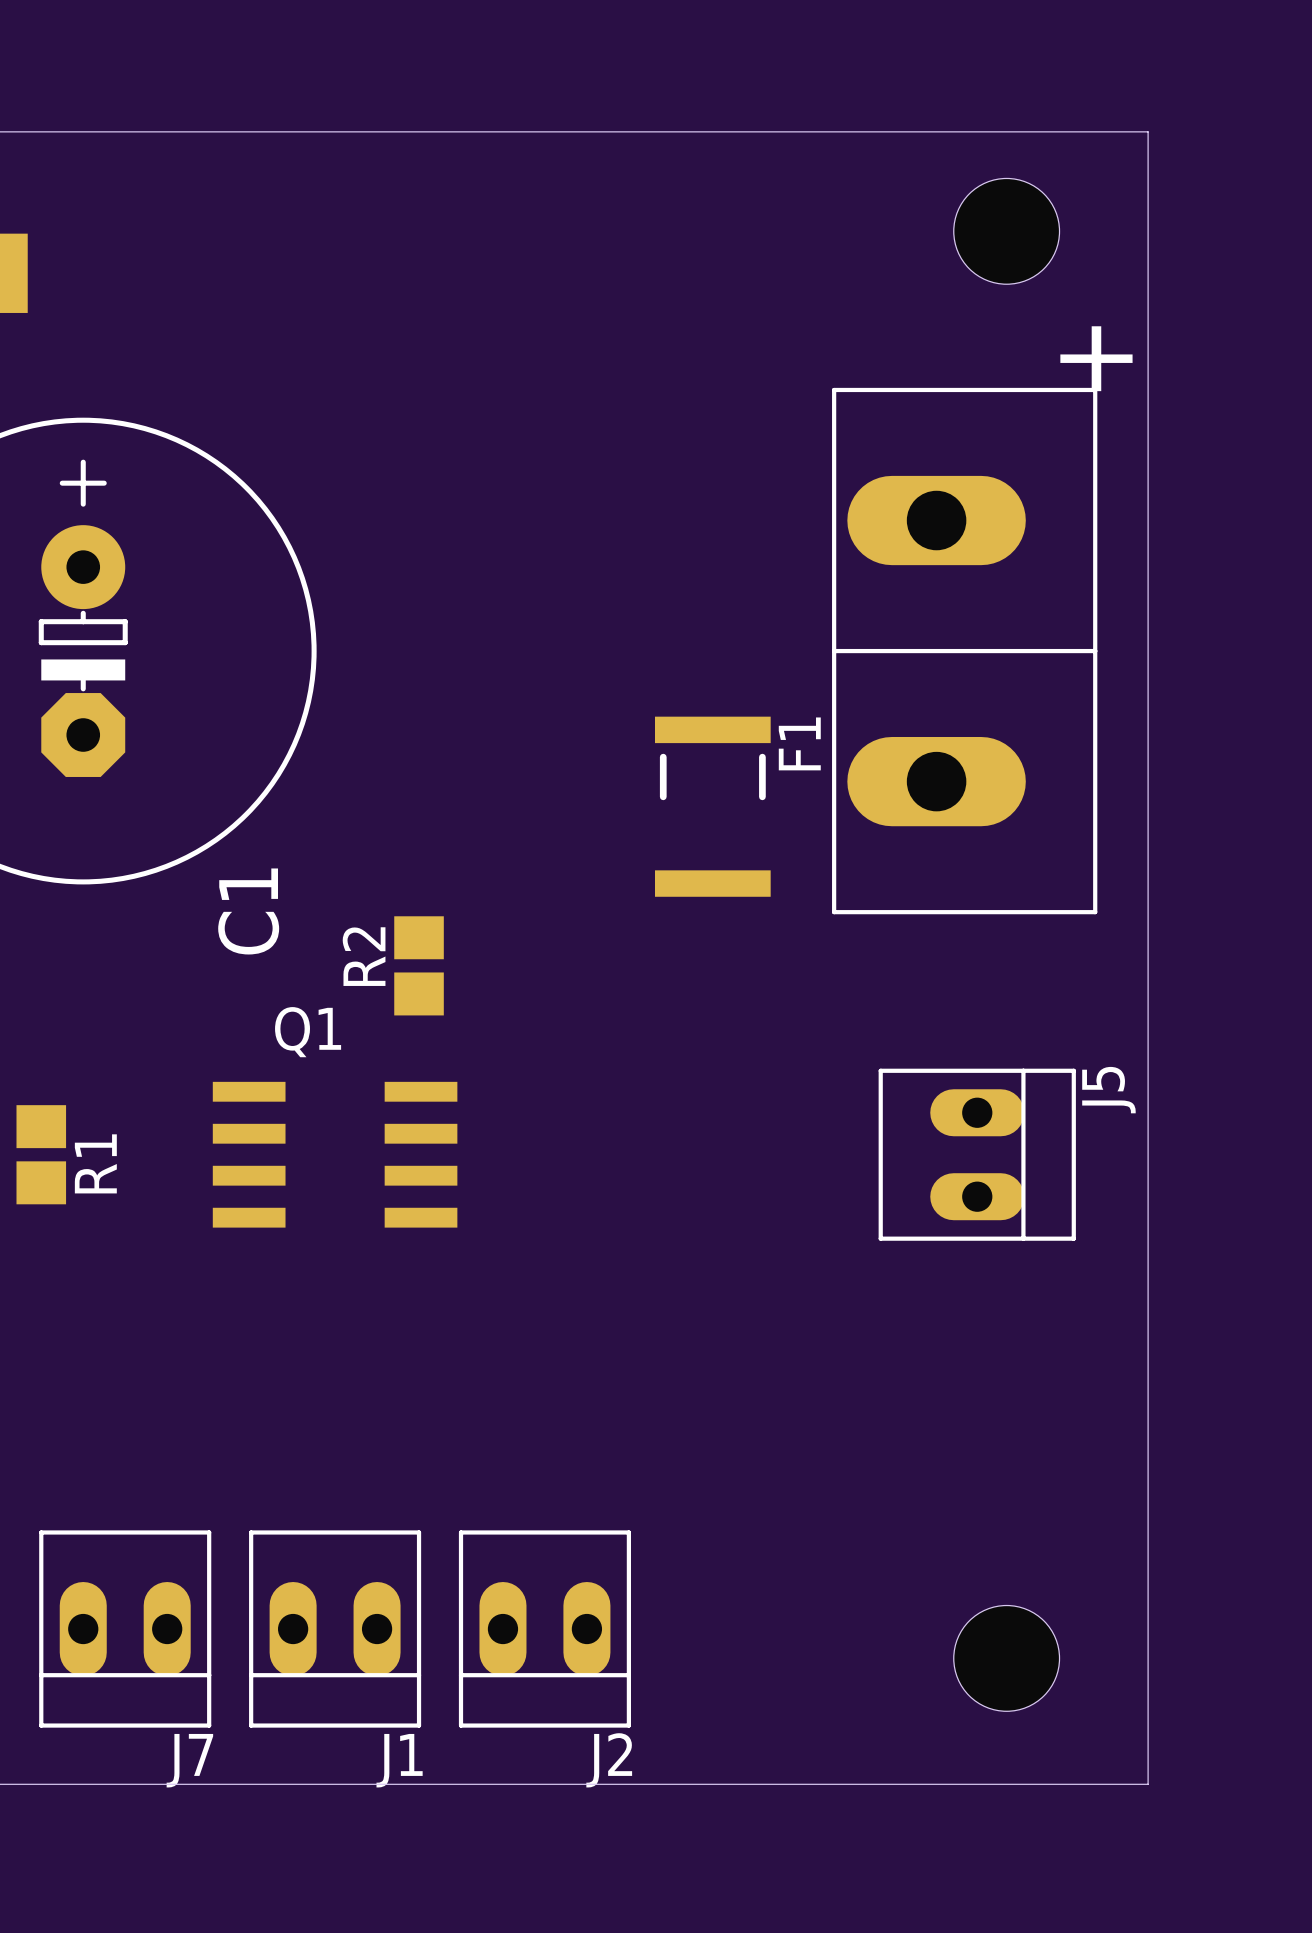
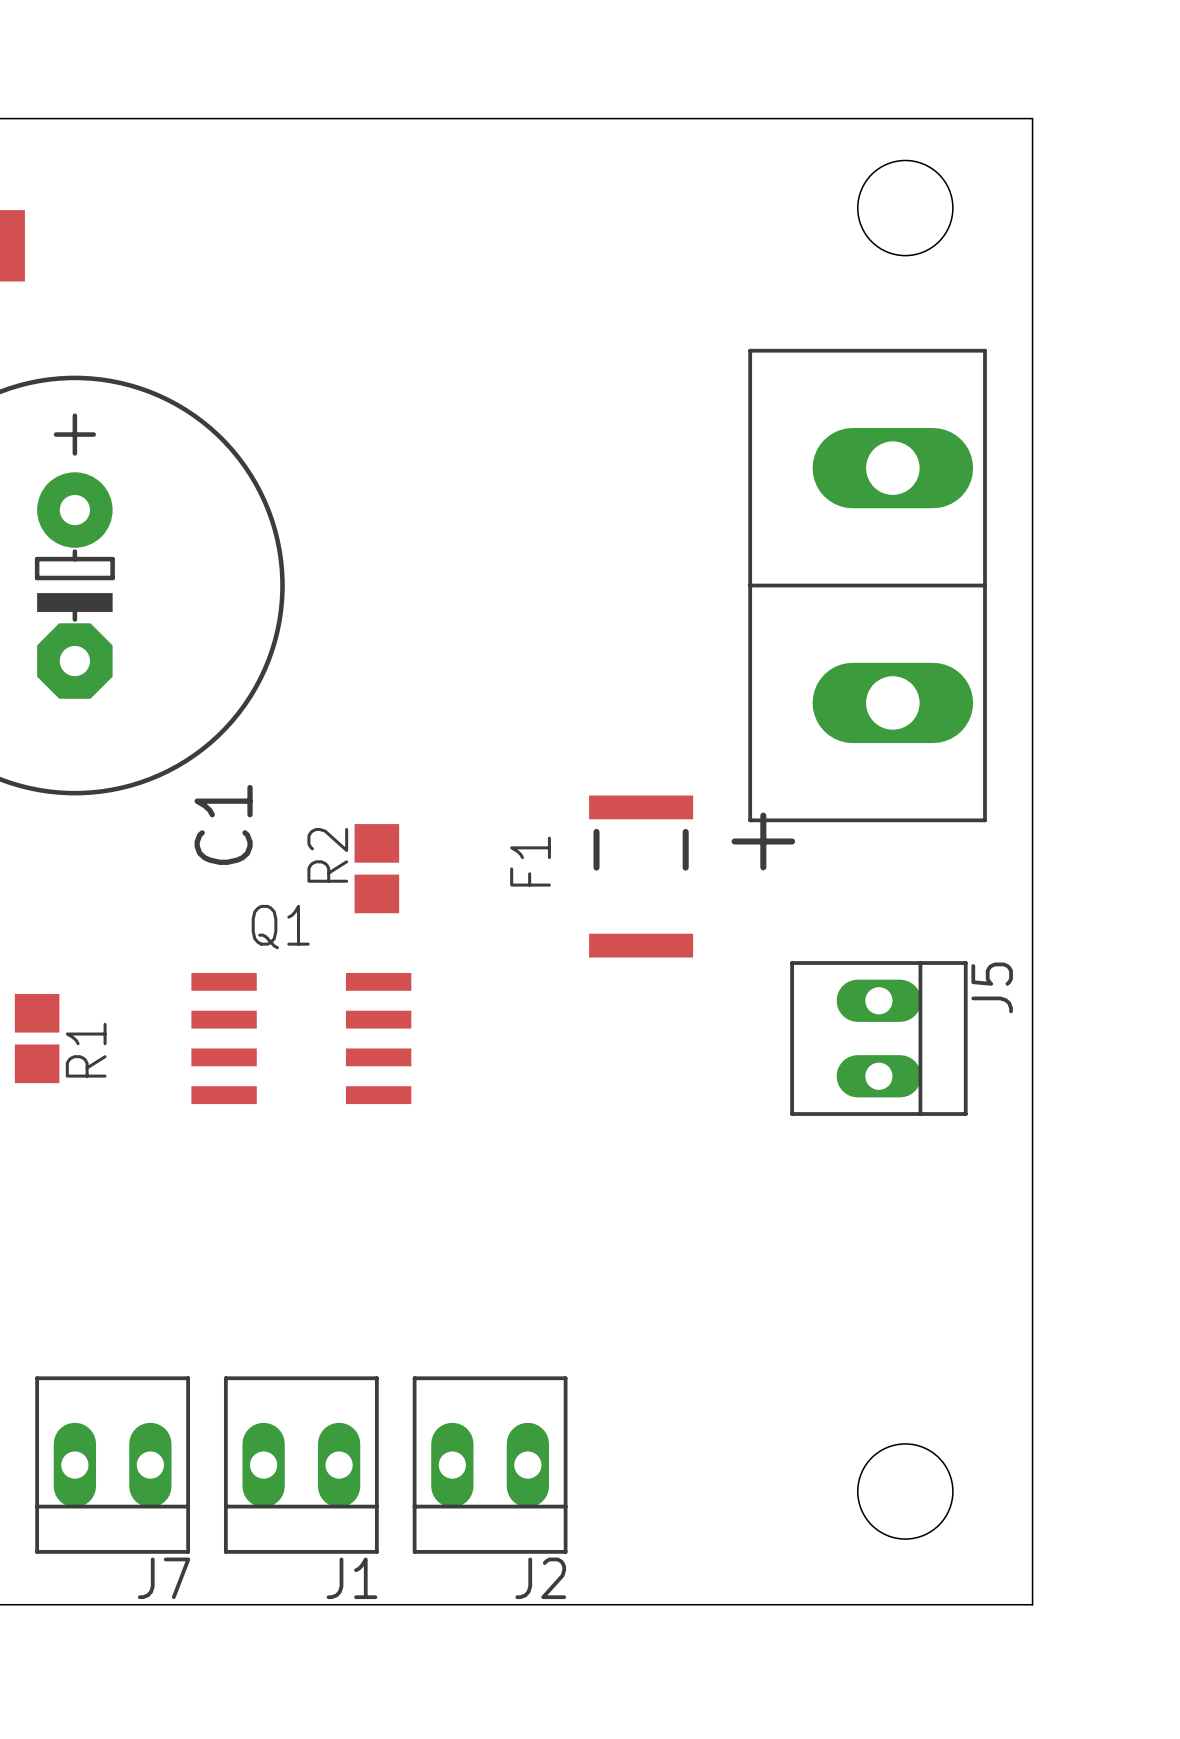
part footprint: [832, 387, 1098, 915] -> [748, 348, 987, 823]
F1 name position: F1 (799, 743) -> F1 (530, 861)
F1 position: (712, 806) -> (641, 876)

